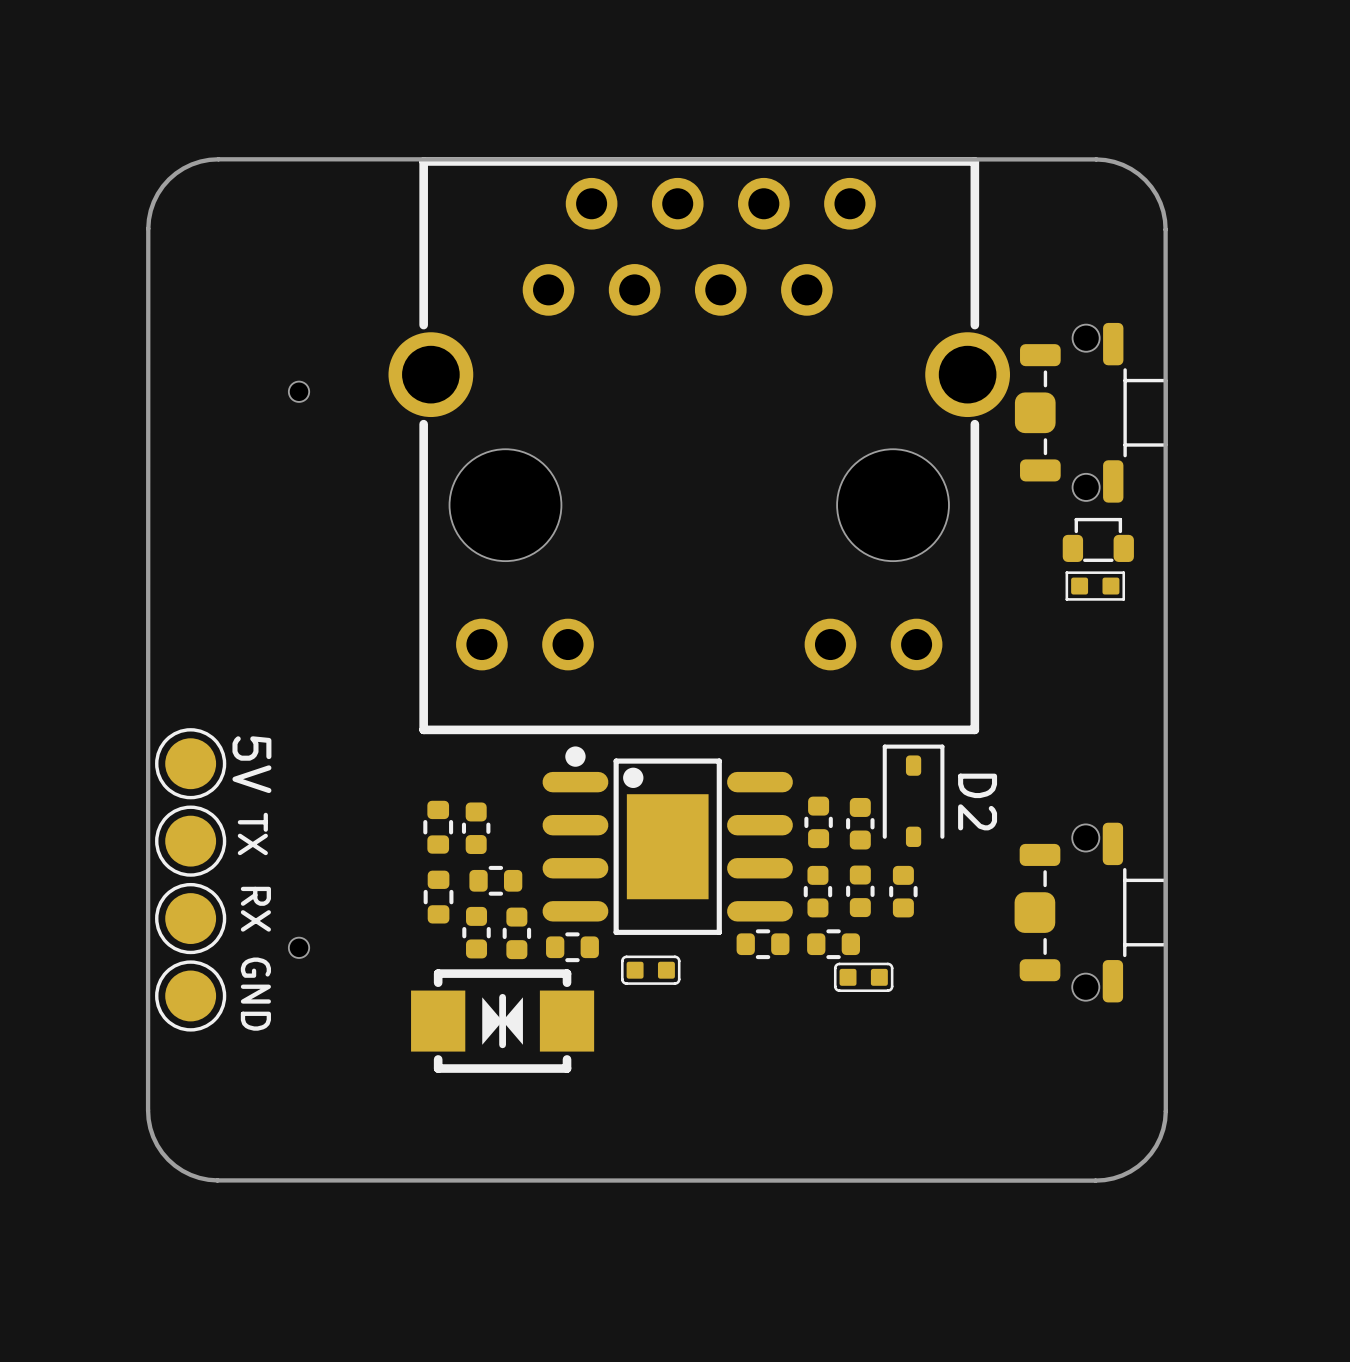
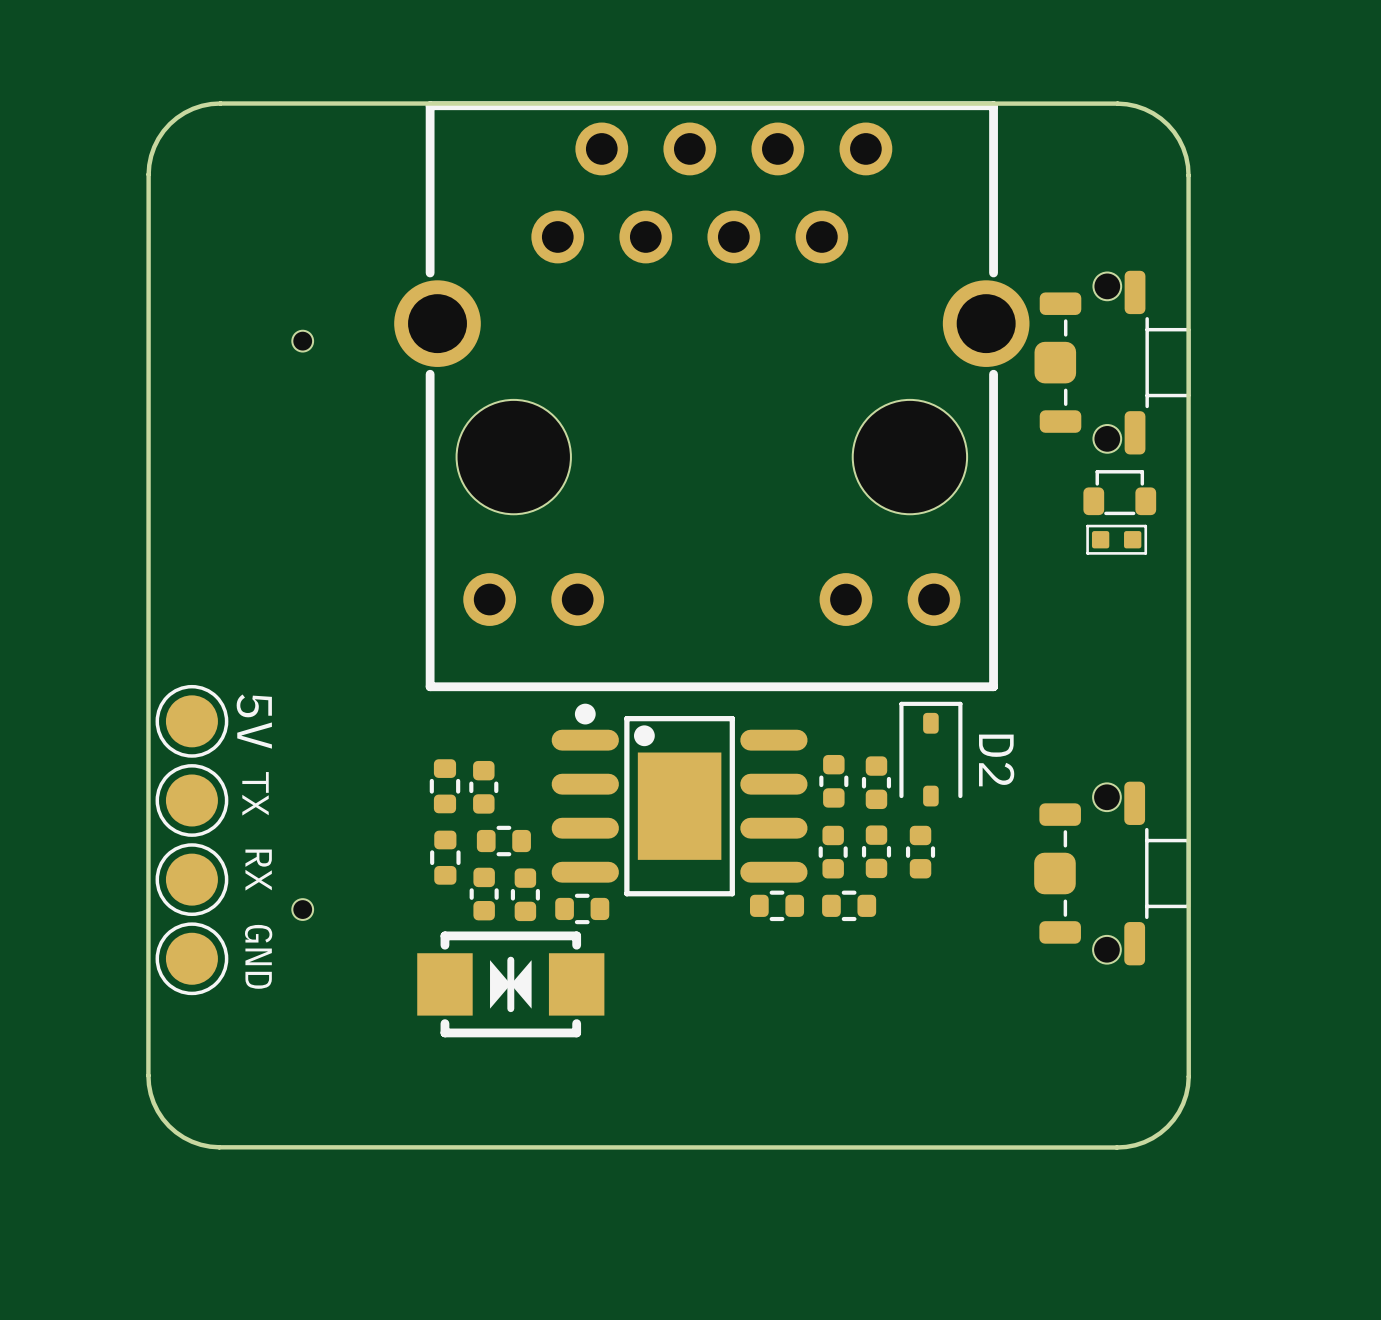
part: (650, 970) -> none
part: (863, 977) -> none

